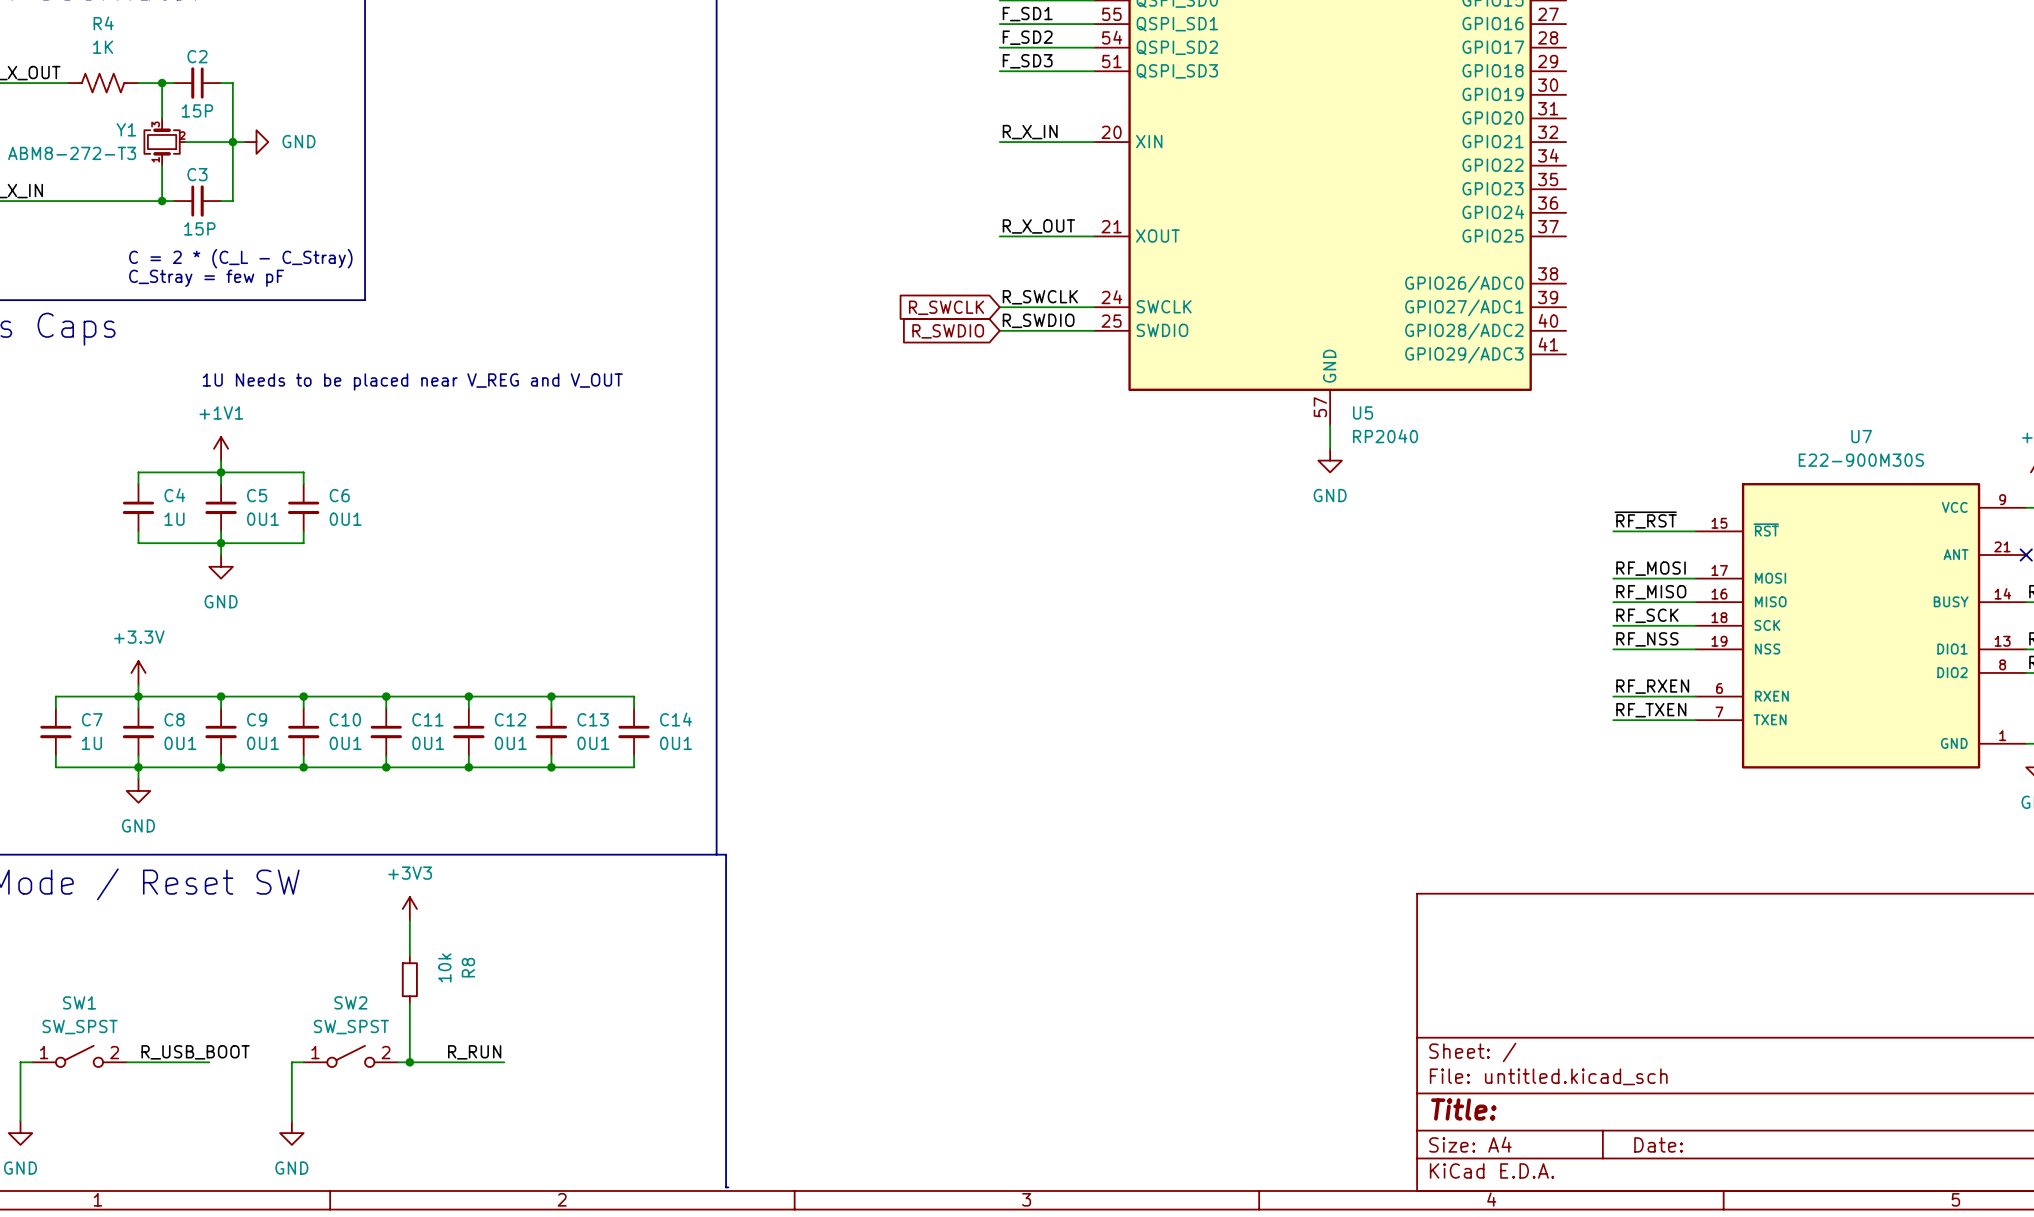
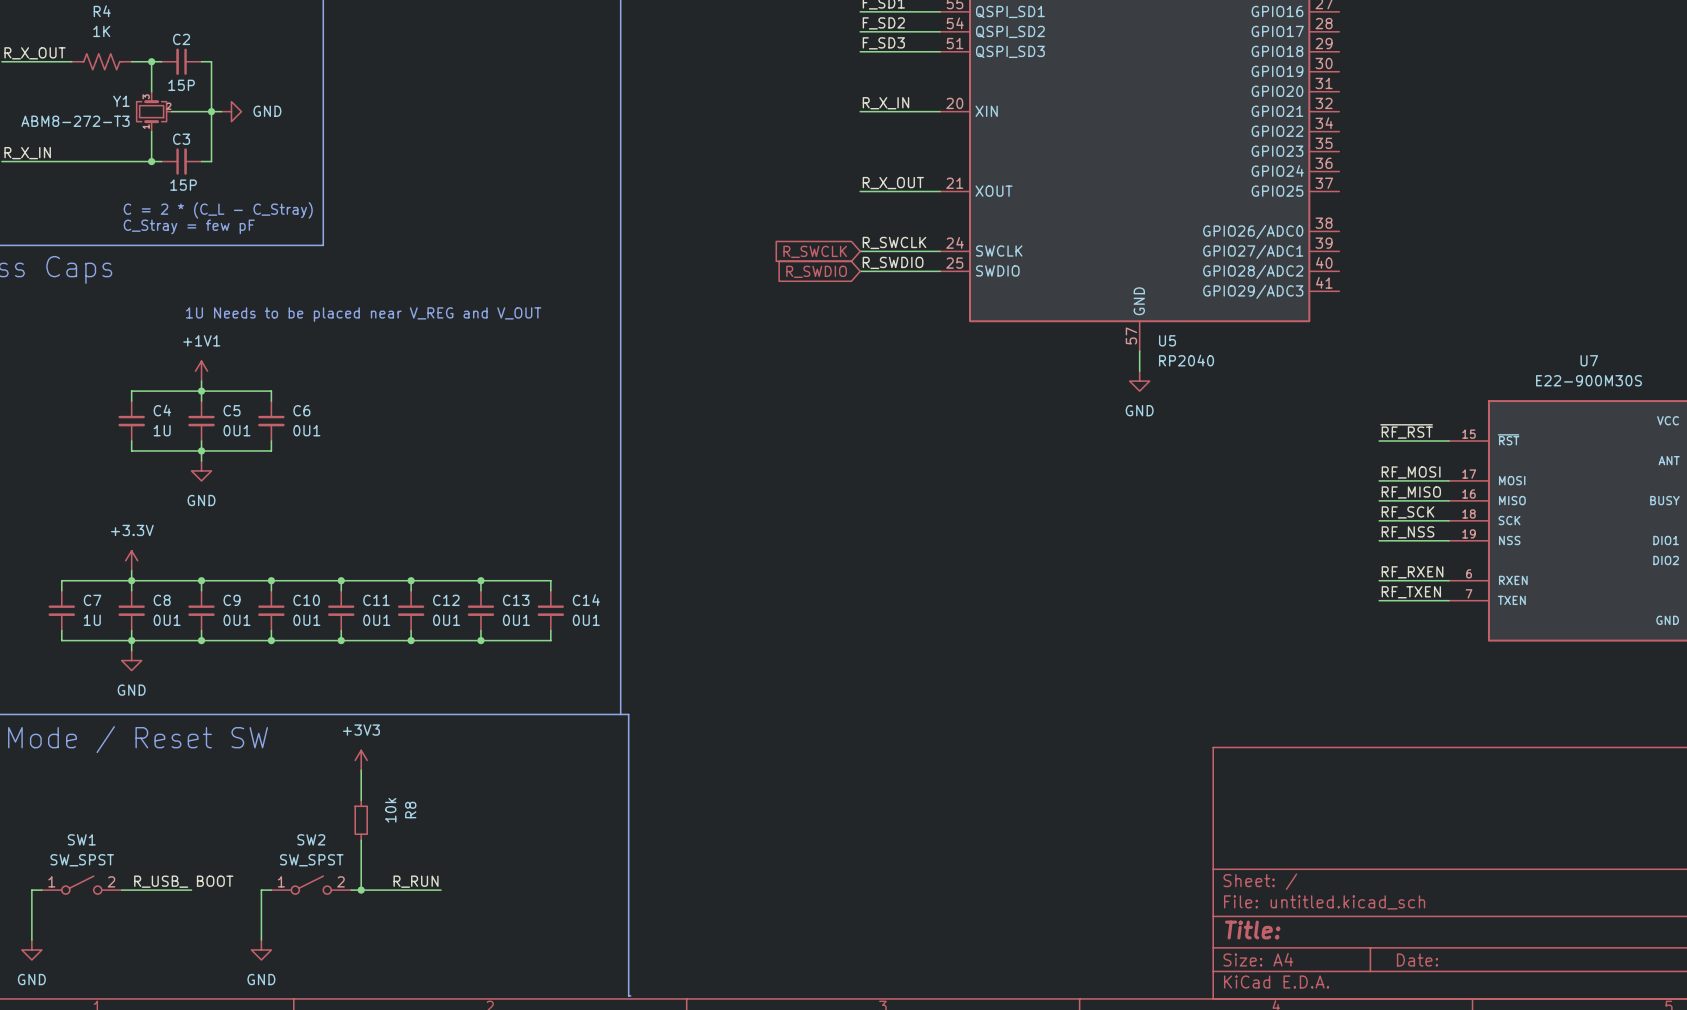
label: R_USB_BOOT (195, 1052) -> R_USB_ BOOT (183, 881)

